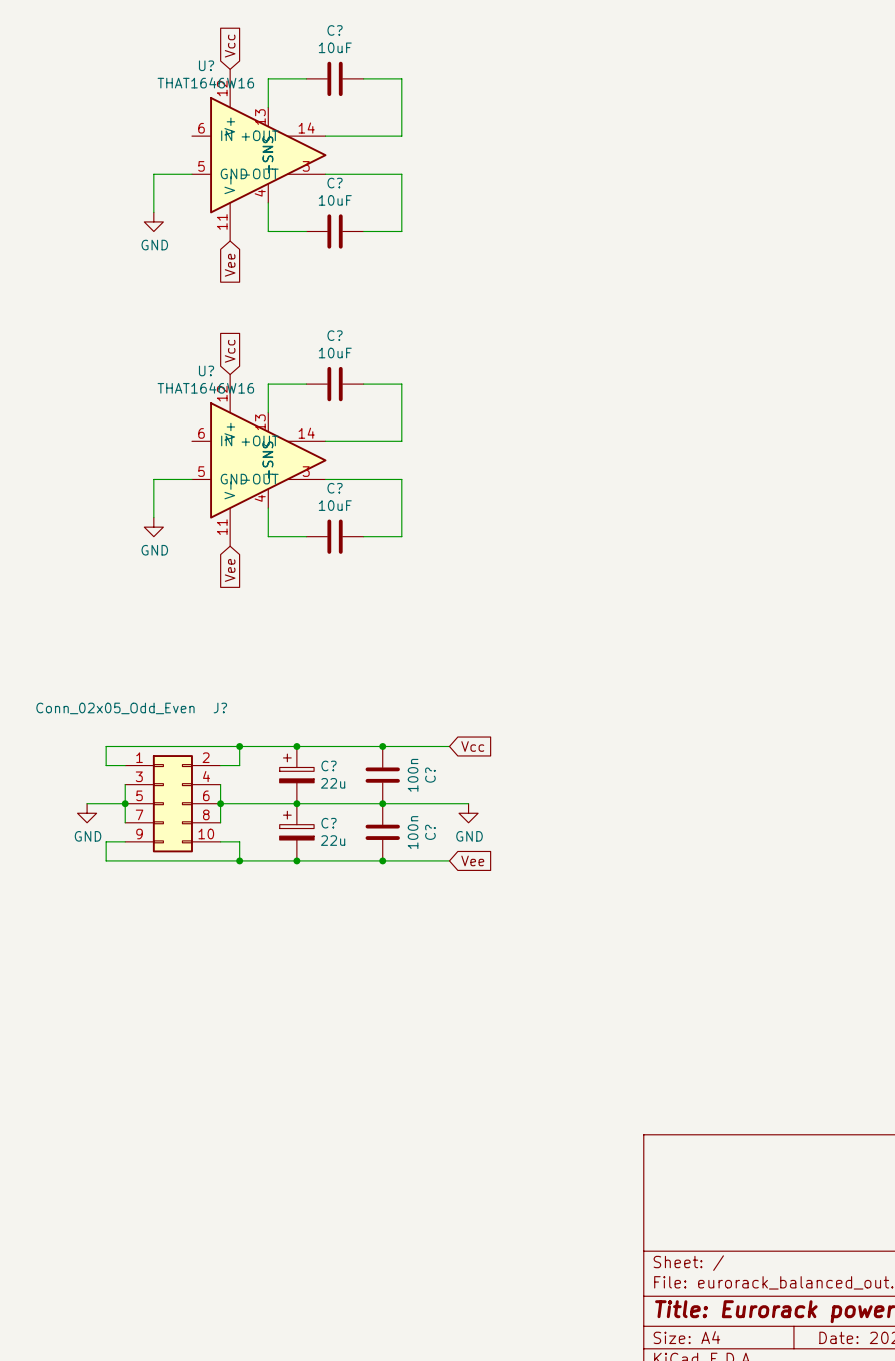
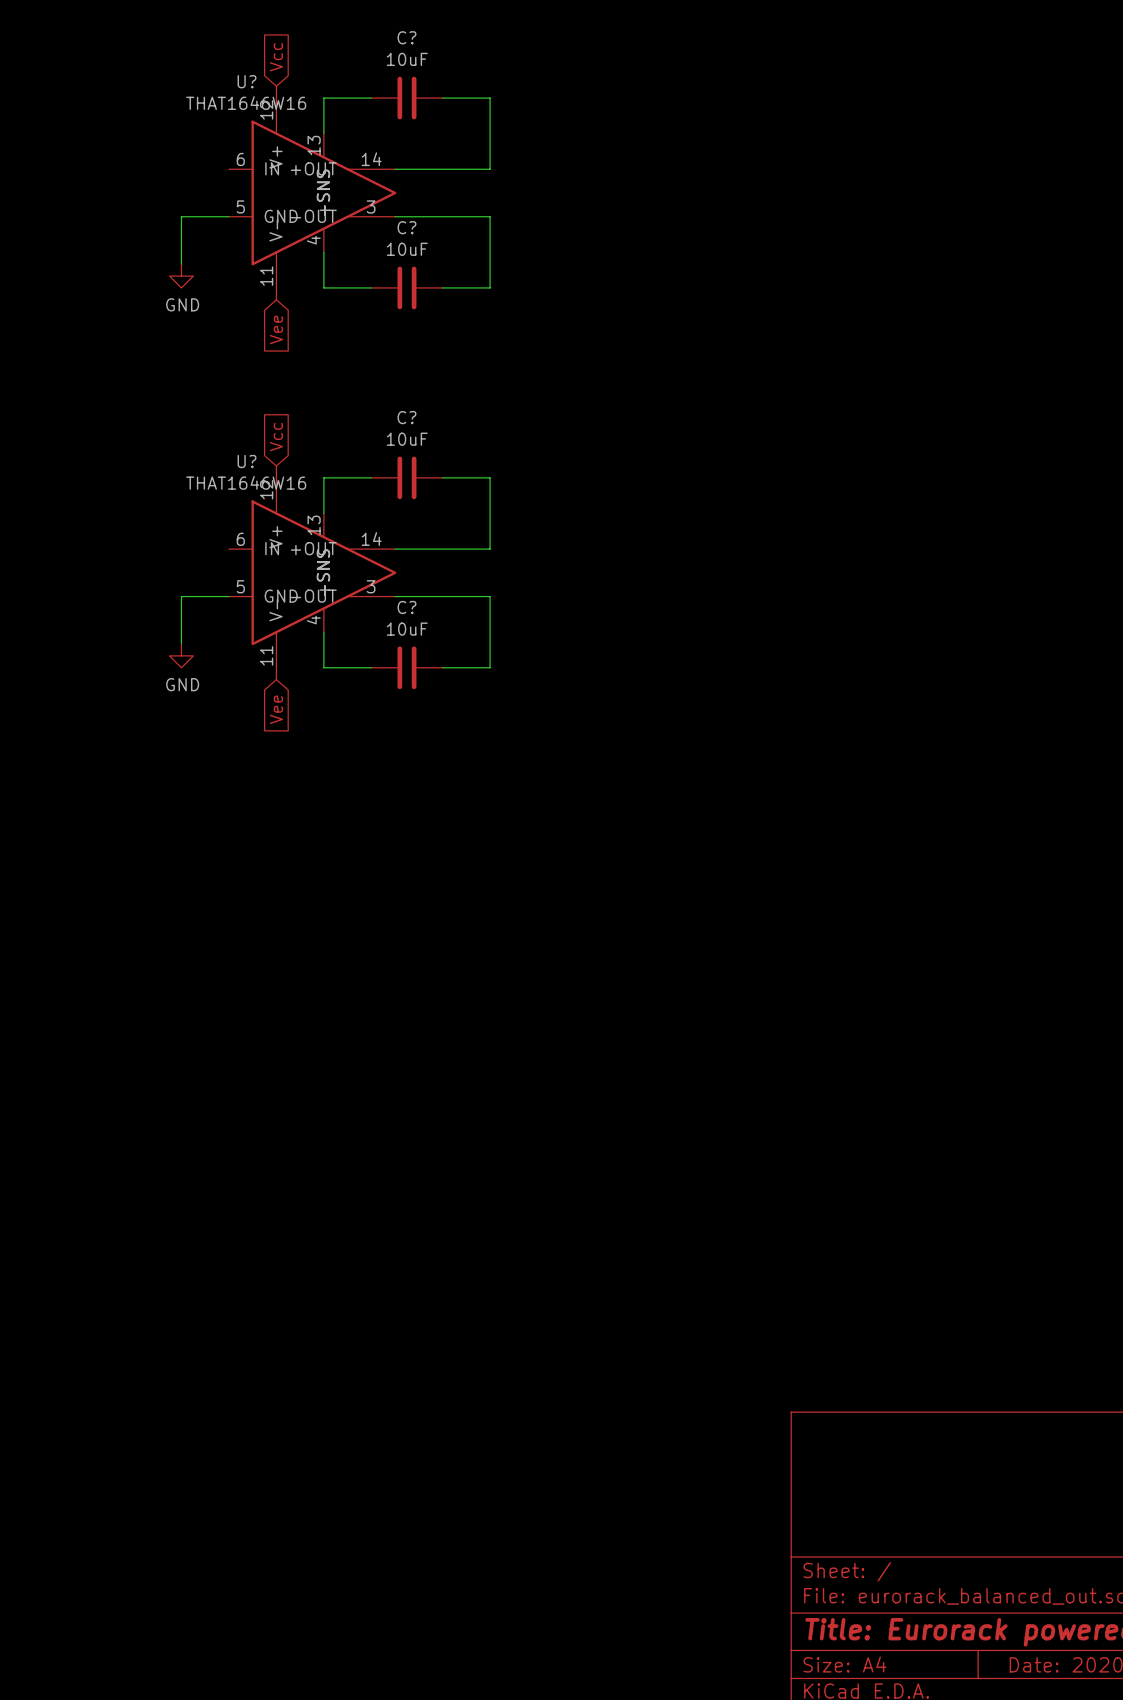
wire: (239, 746) (239, 765) (220, 765) -> none
junction: (239, 746) -> none
junction: (296, 746) -> none
junction: (382, 746) -> none
wire: (449, 746) (106, 746) (106, 765) (125, 765) -> none
global label: Vcc (472, 746) -> none
C?: 22u (296, 775) -> none
C?: 100n (382, 775) -> none
wire: (125, 784) (125, 822) -> none
wire: (220, 784) (220, 822) -> none
wire: (87, 803) (125, 803) -> none
junction: (125, 803) -> none
J?: Conn_02x05_Odd_Even (172, 803) -> none
wire: (220, 803) (468, 803) -> none
junction: (220, 803) -> none
junction: (296, 803) -> none
junction: (382, 803) -> none
power symbol: GND (87, 813) -> none
power symbol: GND (468, 813) -> none
C?: 22u (296, 832) -> none
C?: 100n (382, 832) -> none
wire: (125, 841) (106, 841) (106, 860) (449, 860) -> none
wire: (220, 841) (239, 841) (239, 860) -> none
junction: (239, 860) -> none
junction: (296, 860) -> none
junction: (382, 860) -> none
global label: Vee (472, 860) -> none

